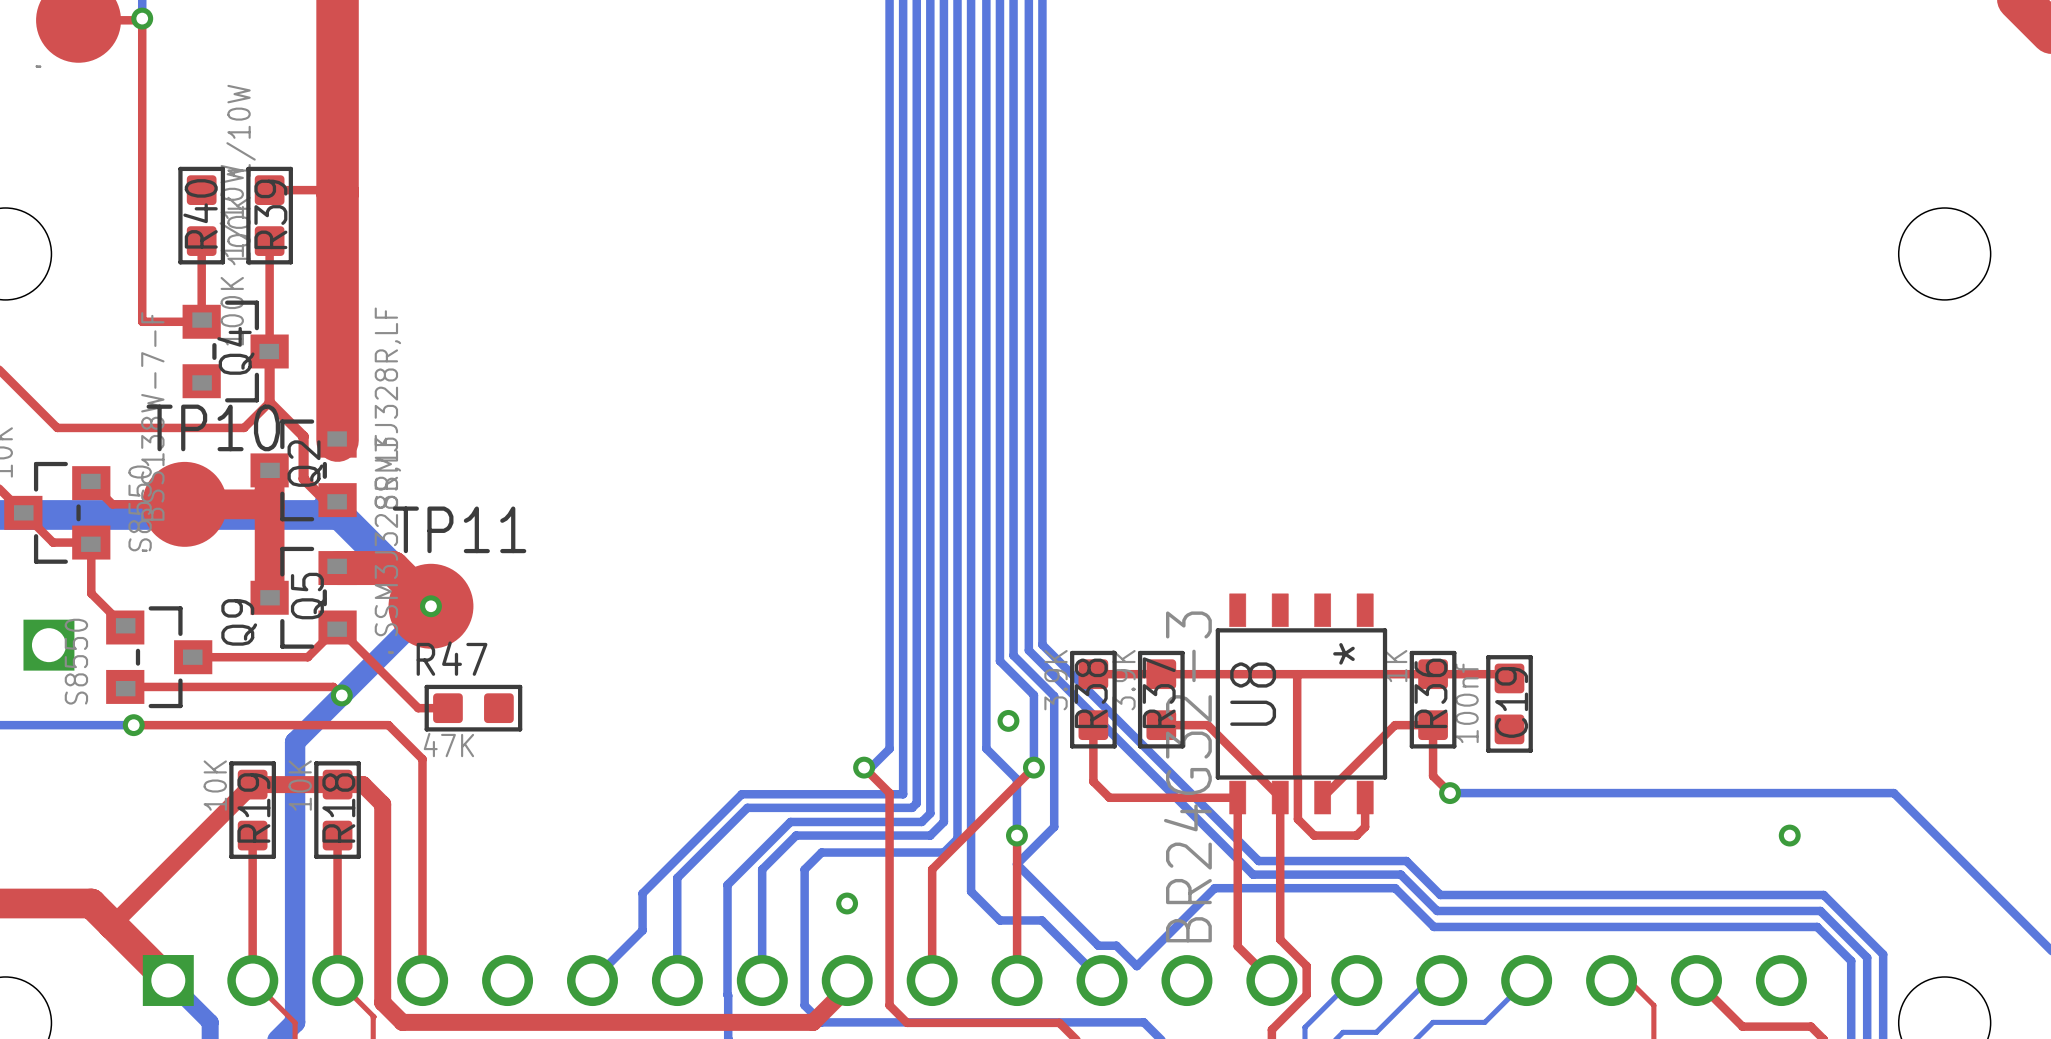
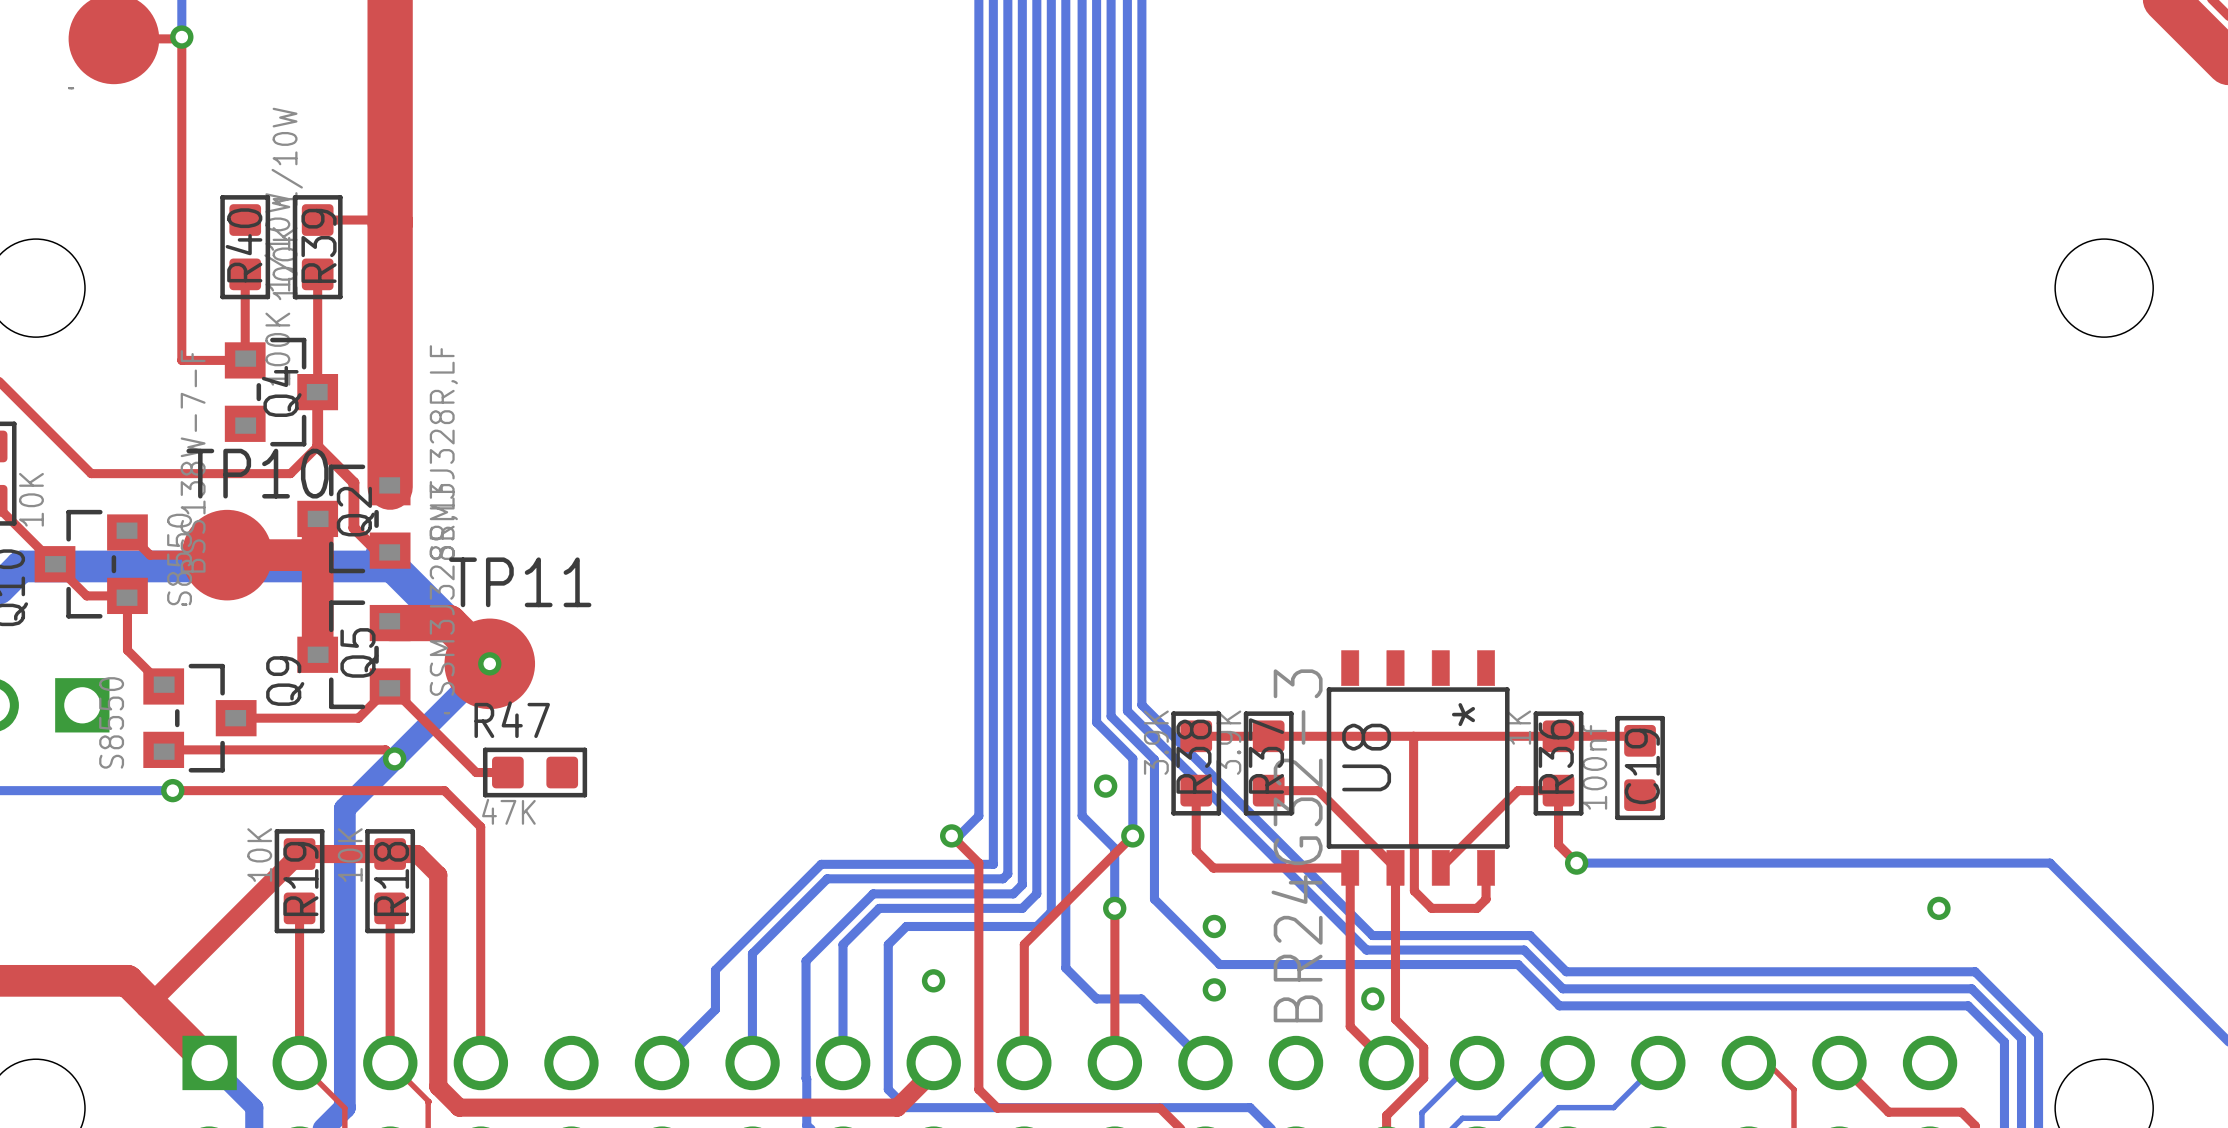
bottom track: (1054, 826) (1016, 864) (1098, 945) (1116, 945) (1136, 966) (1214, 888) -> (1154, 899) (1219, 964) (1325, 964)
via: none -> (1214, 926)
via: none -> (1214, 989)
via: none -> (1372, 998)

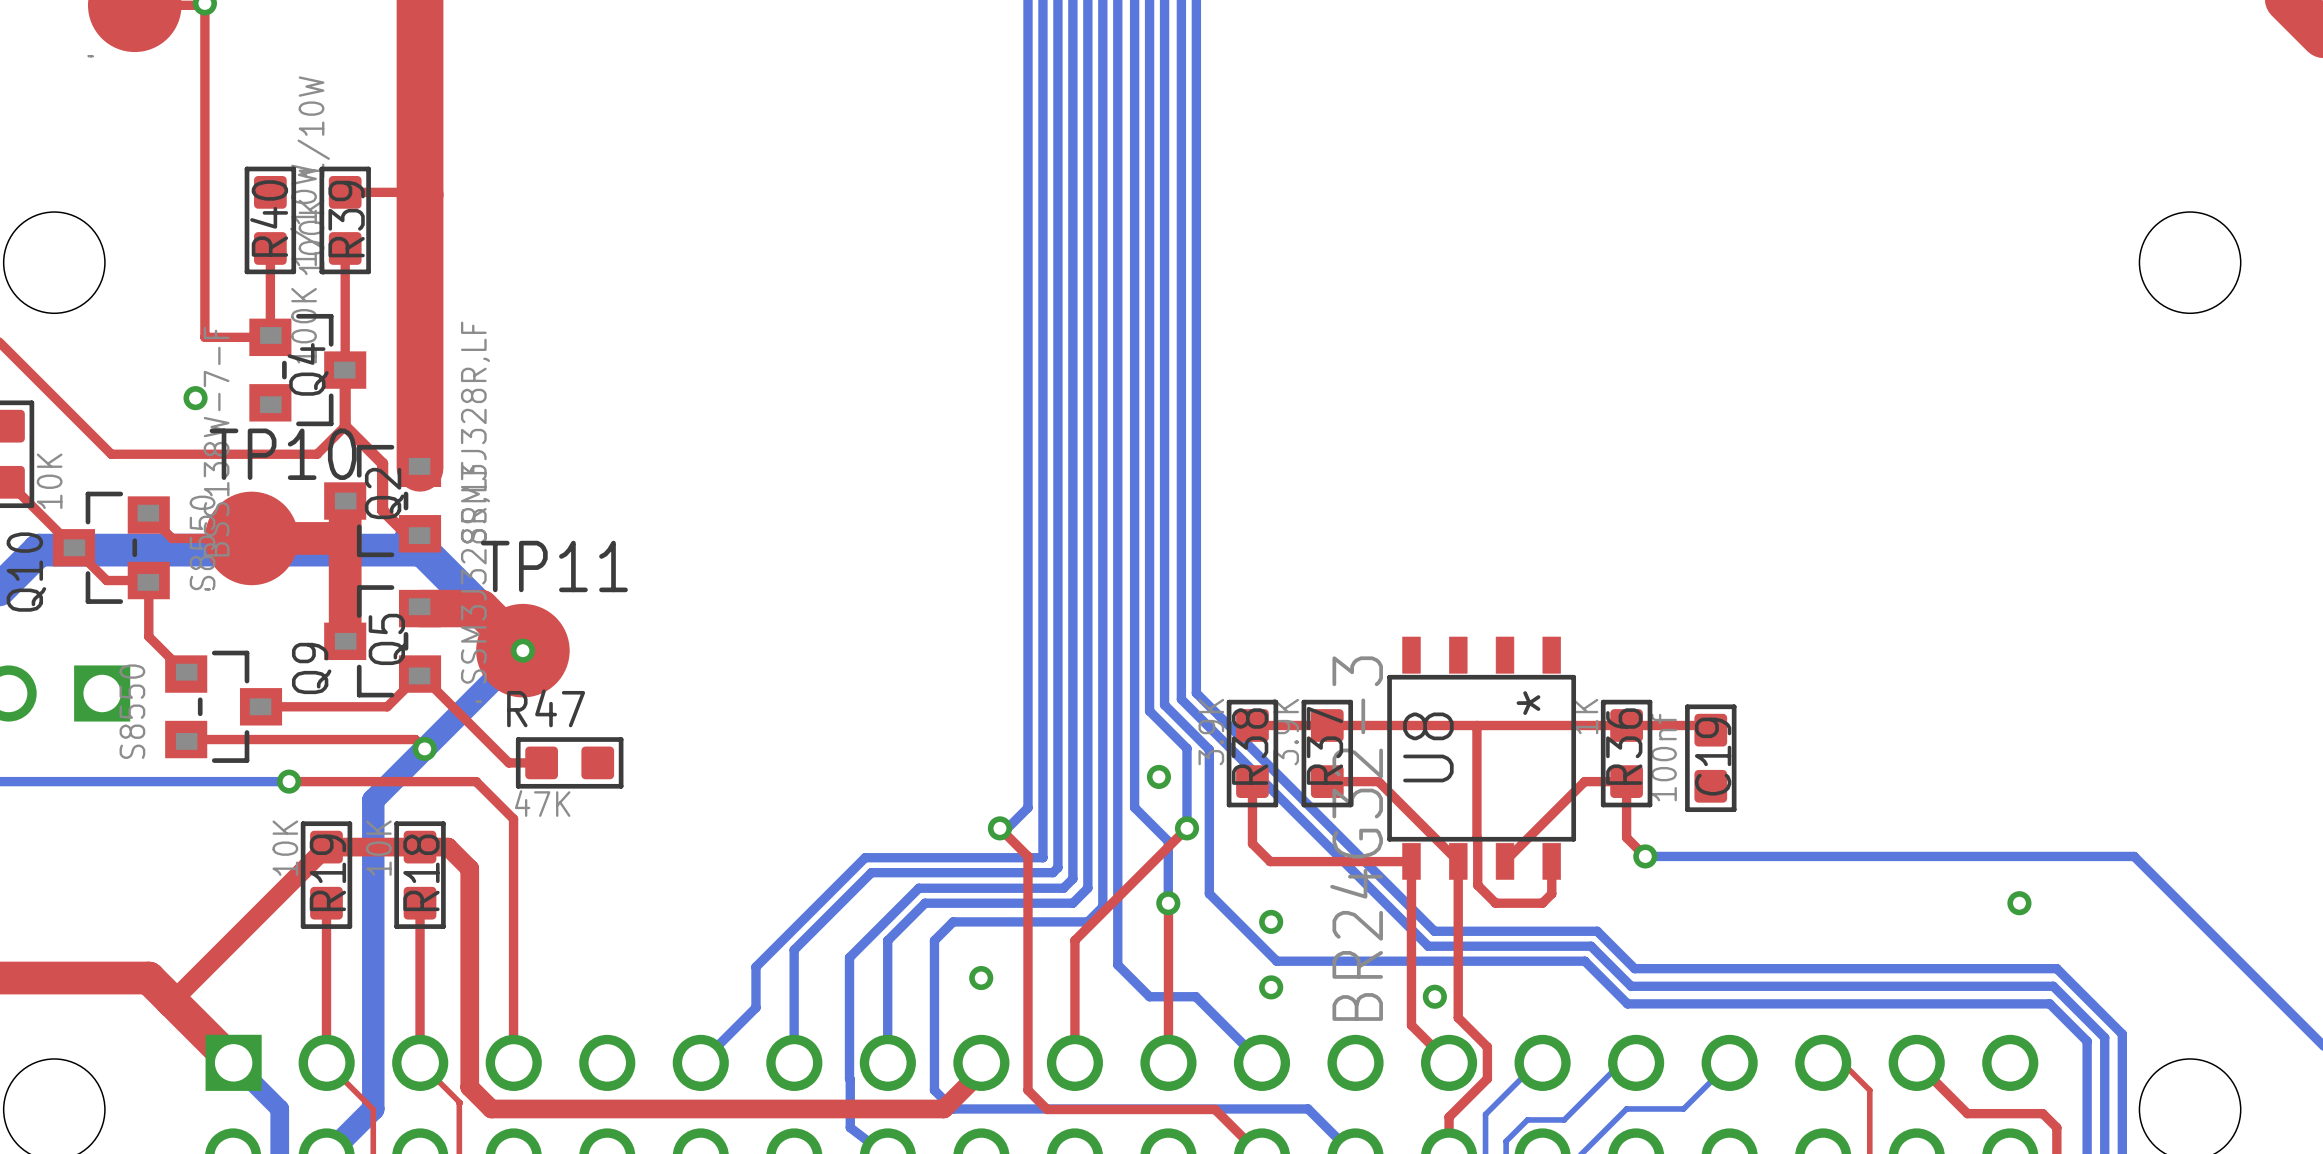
via: none -> (195, 398)
top track: (172, 790) (263, 790) -> none
bottom track: none -> (195, 781) (289, 781)
via position: (172, 790) -> (289, 781)

